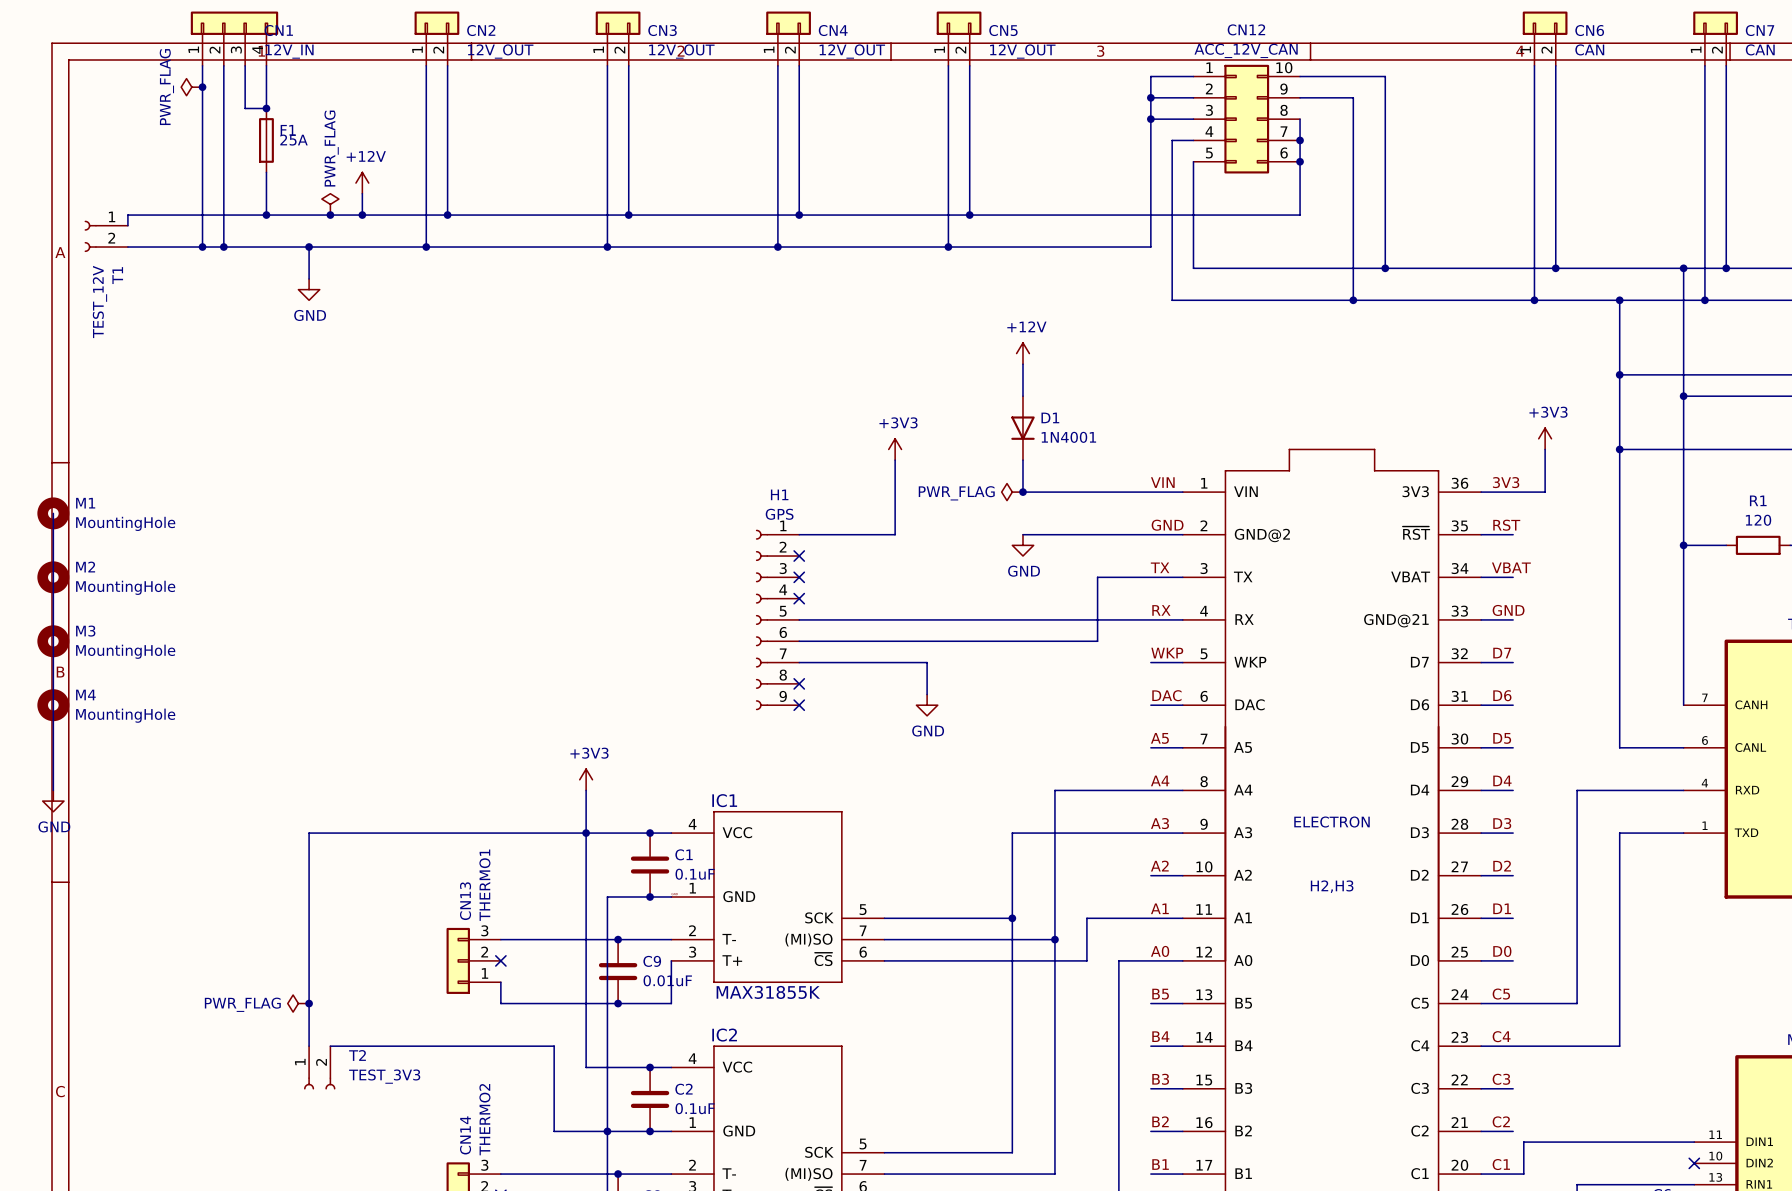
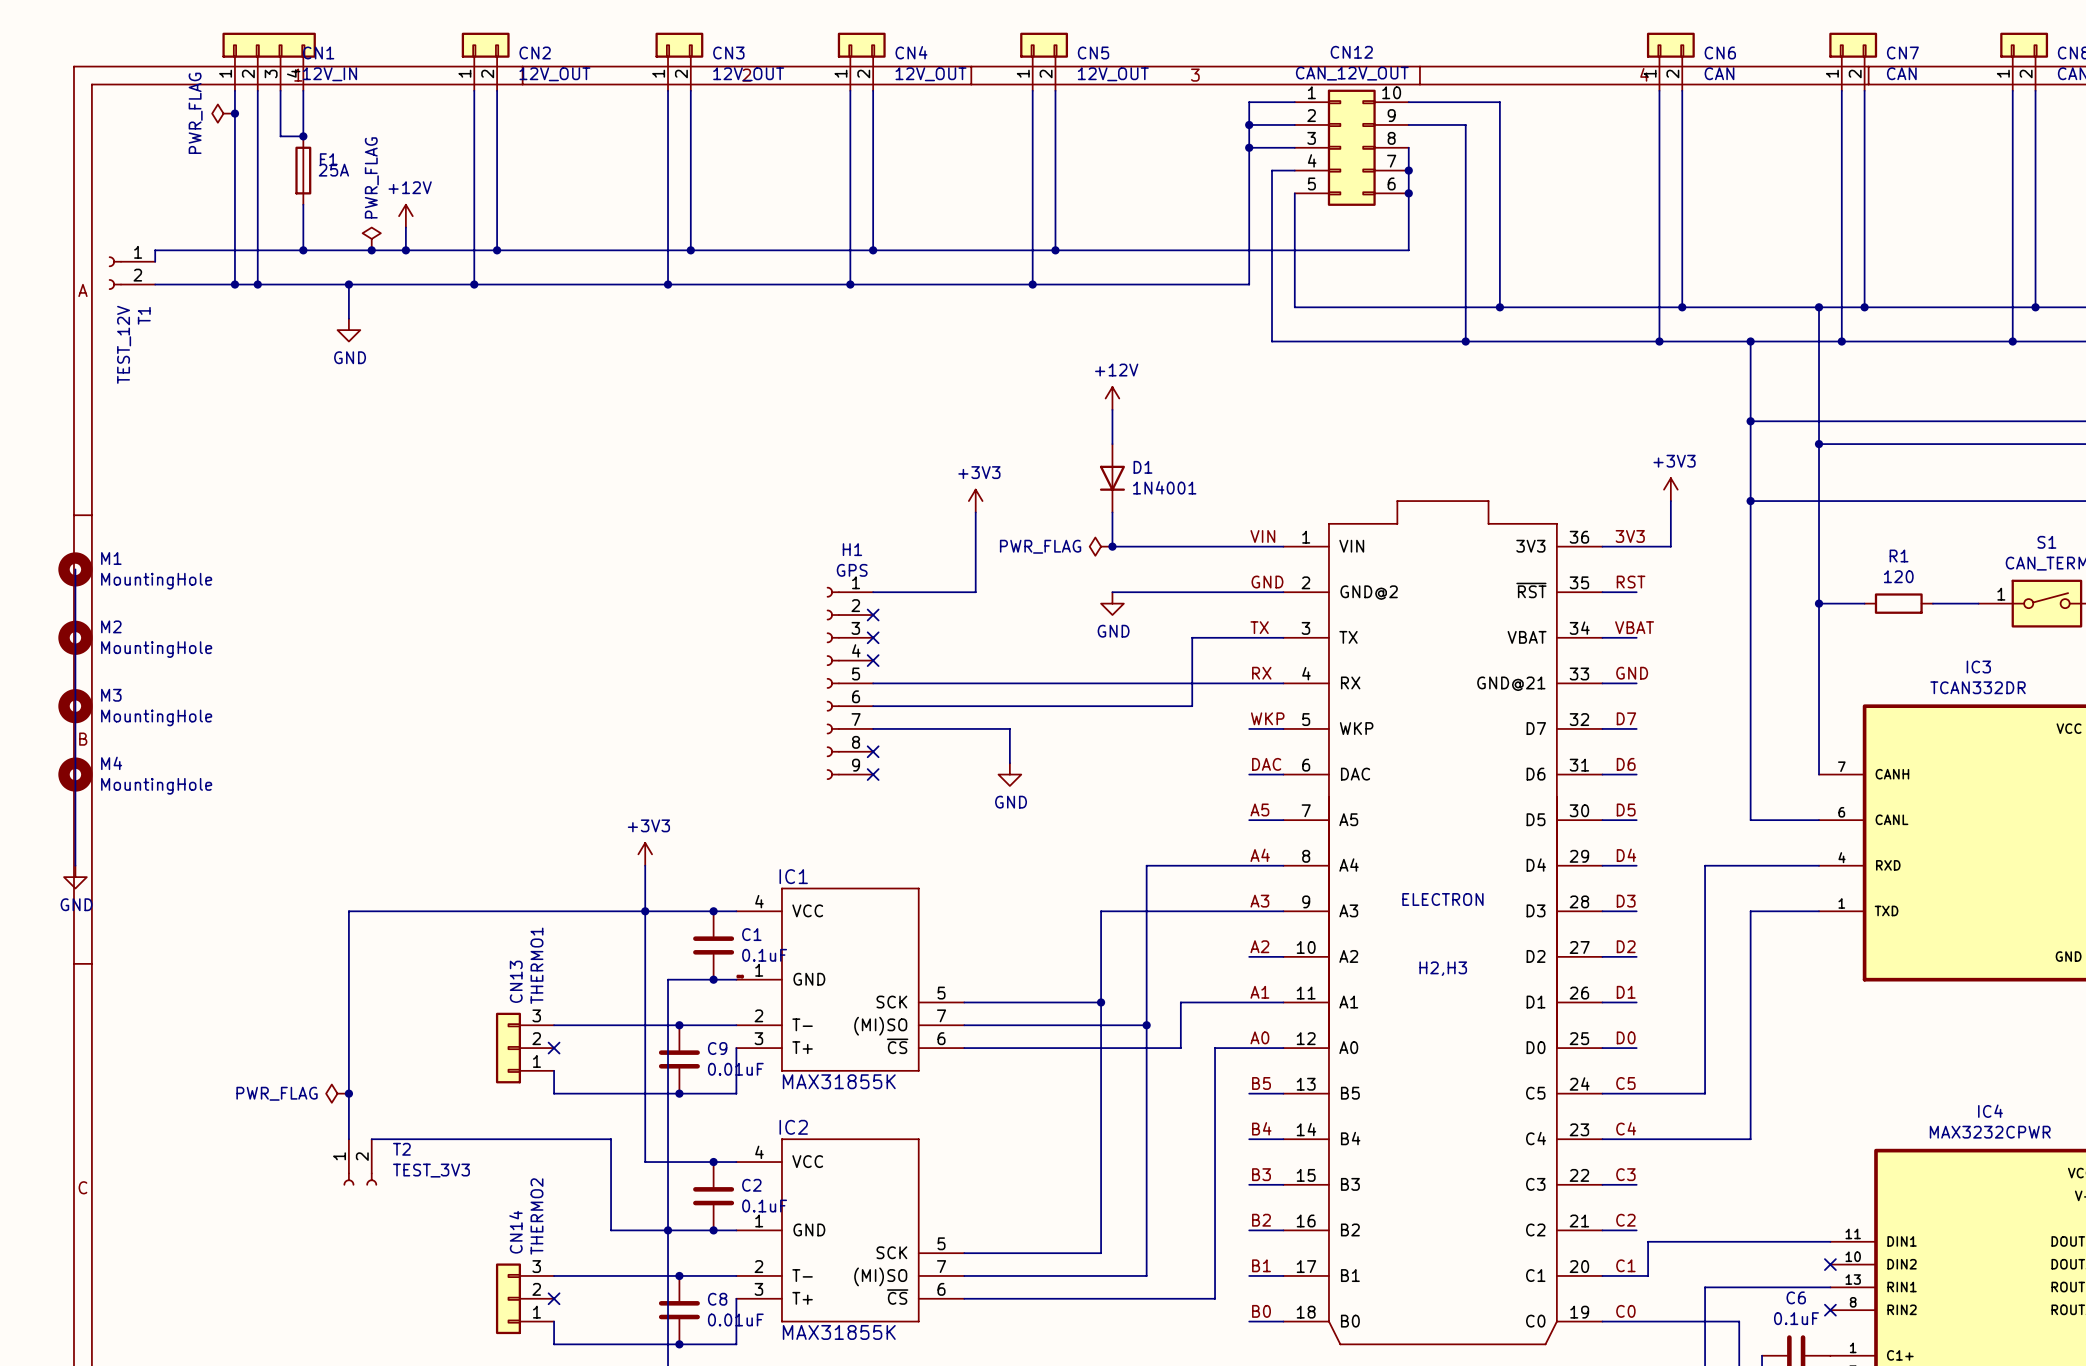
CN12 value: ACC_12V_CAN (1246, 50) -> CAN_12V_OUT (1352, 73)

